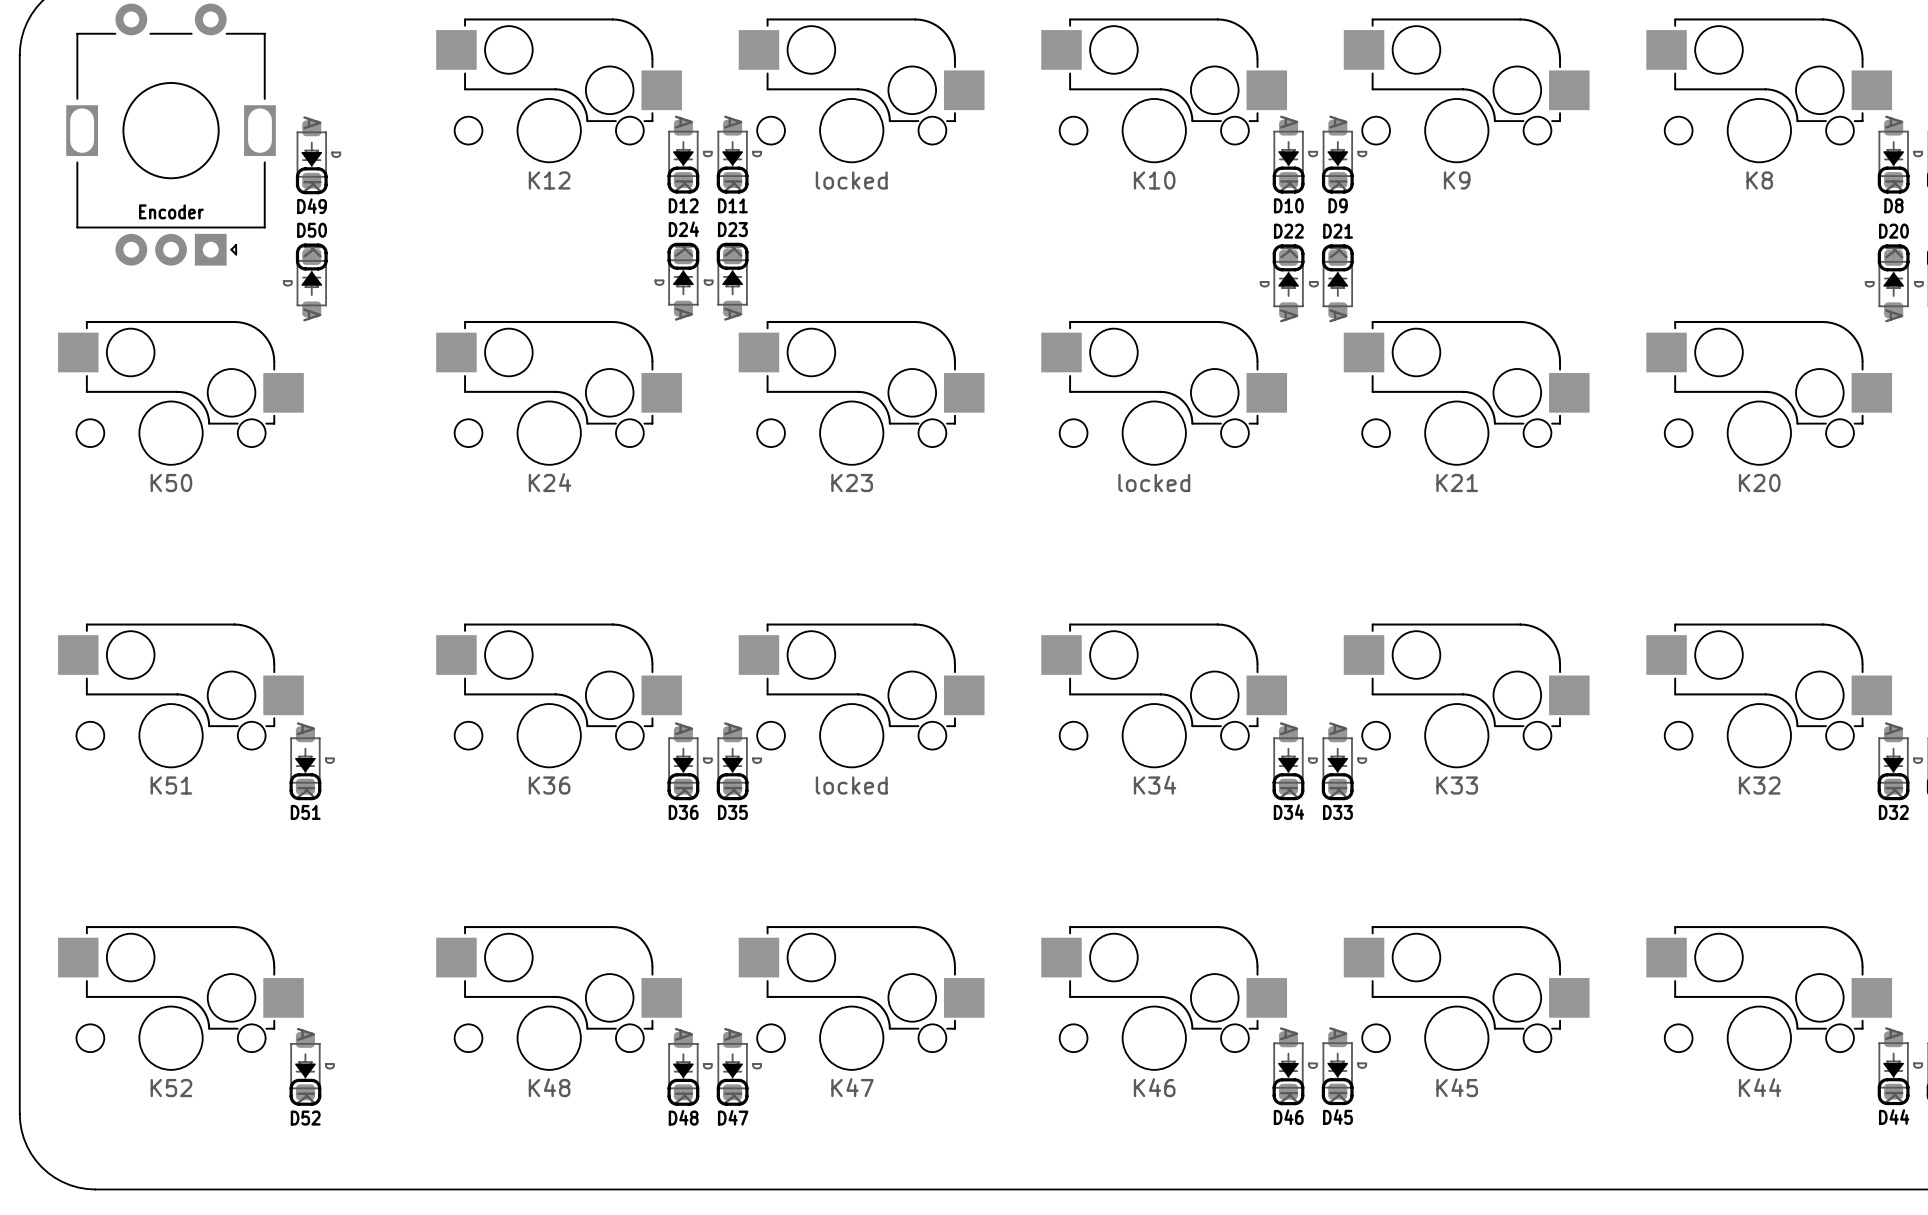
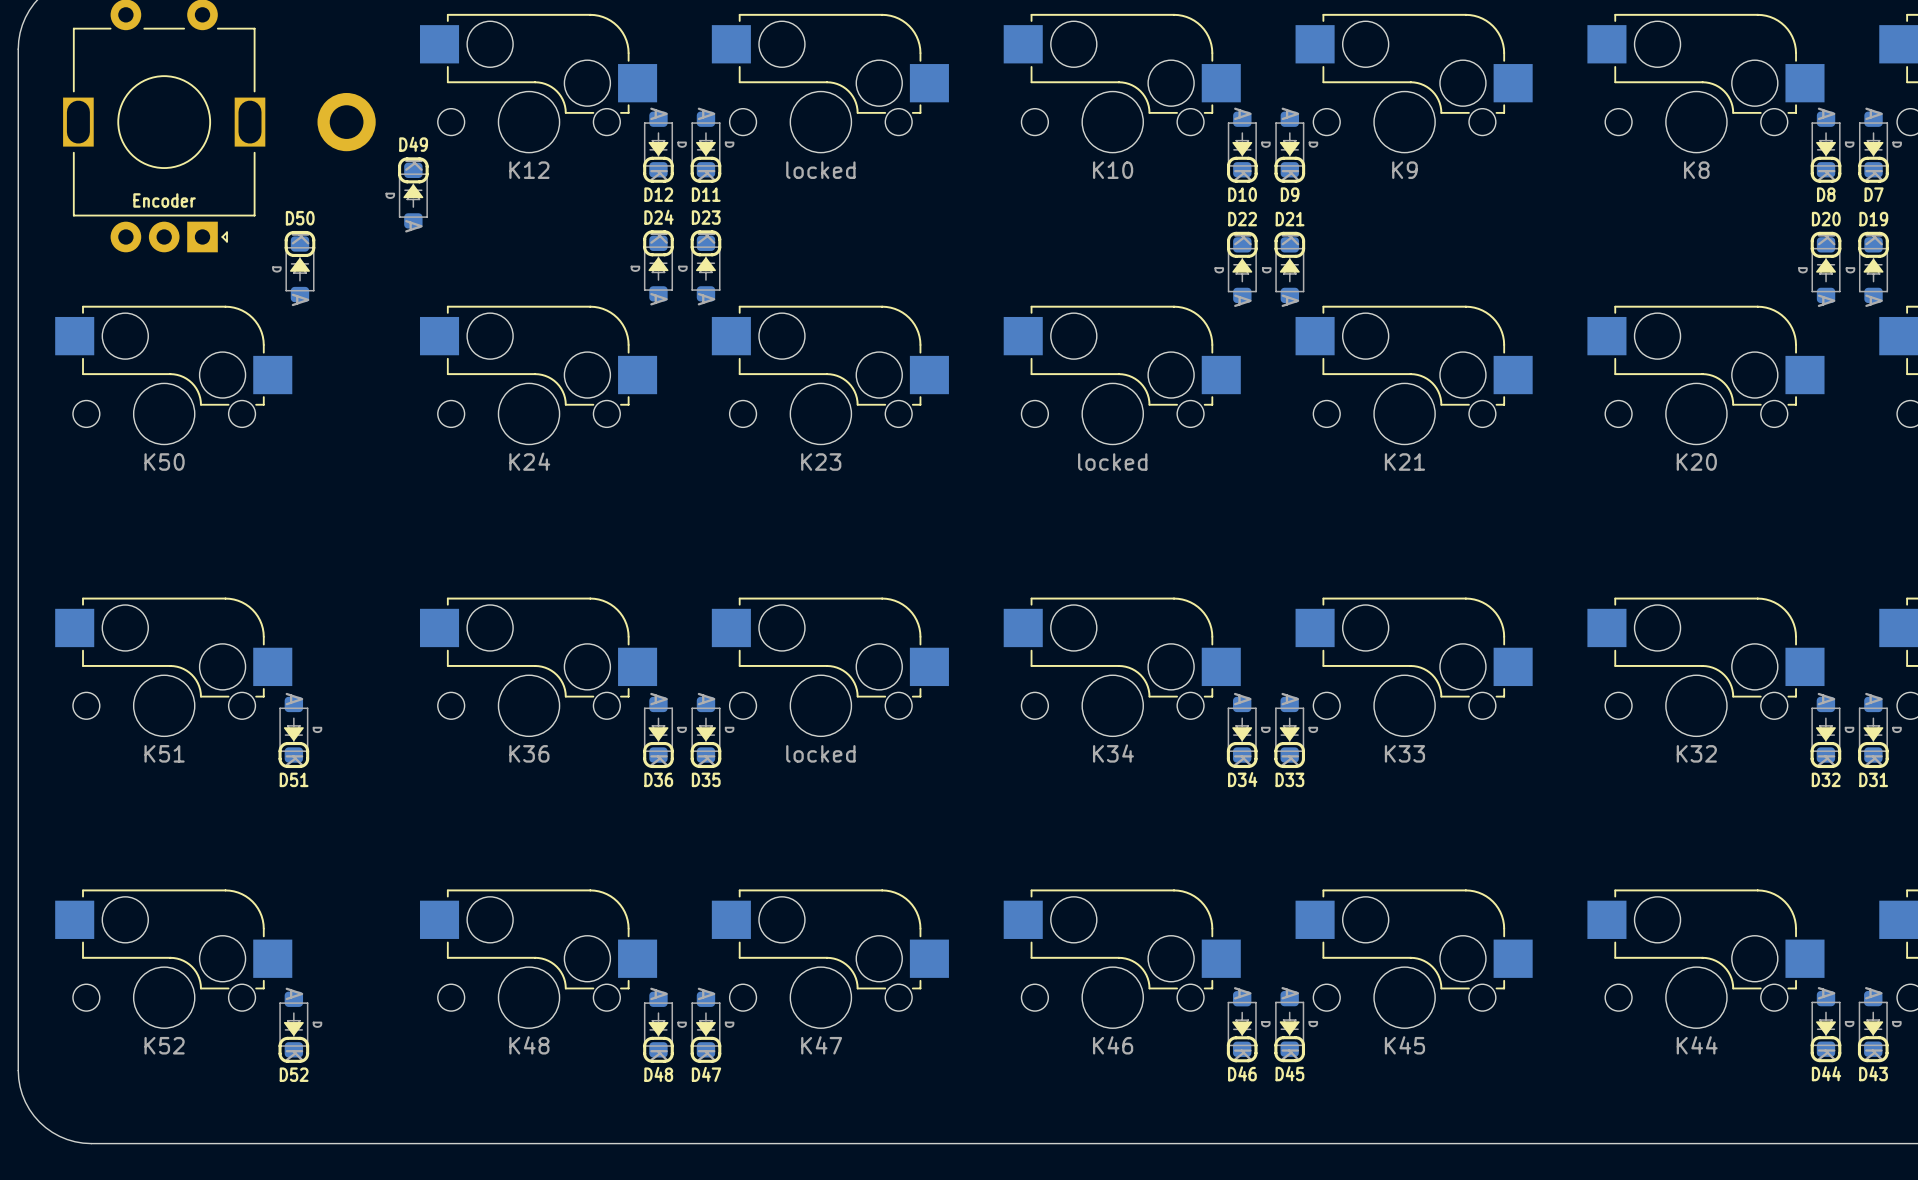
part: none -> (346, 122)
D49 rotation: 0° (311, 157) -> 180° (413, 192)
D49 position: (311, 157) -> (413, 192)

